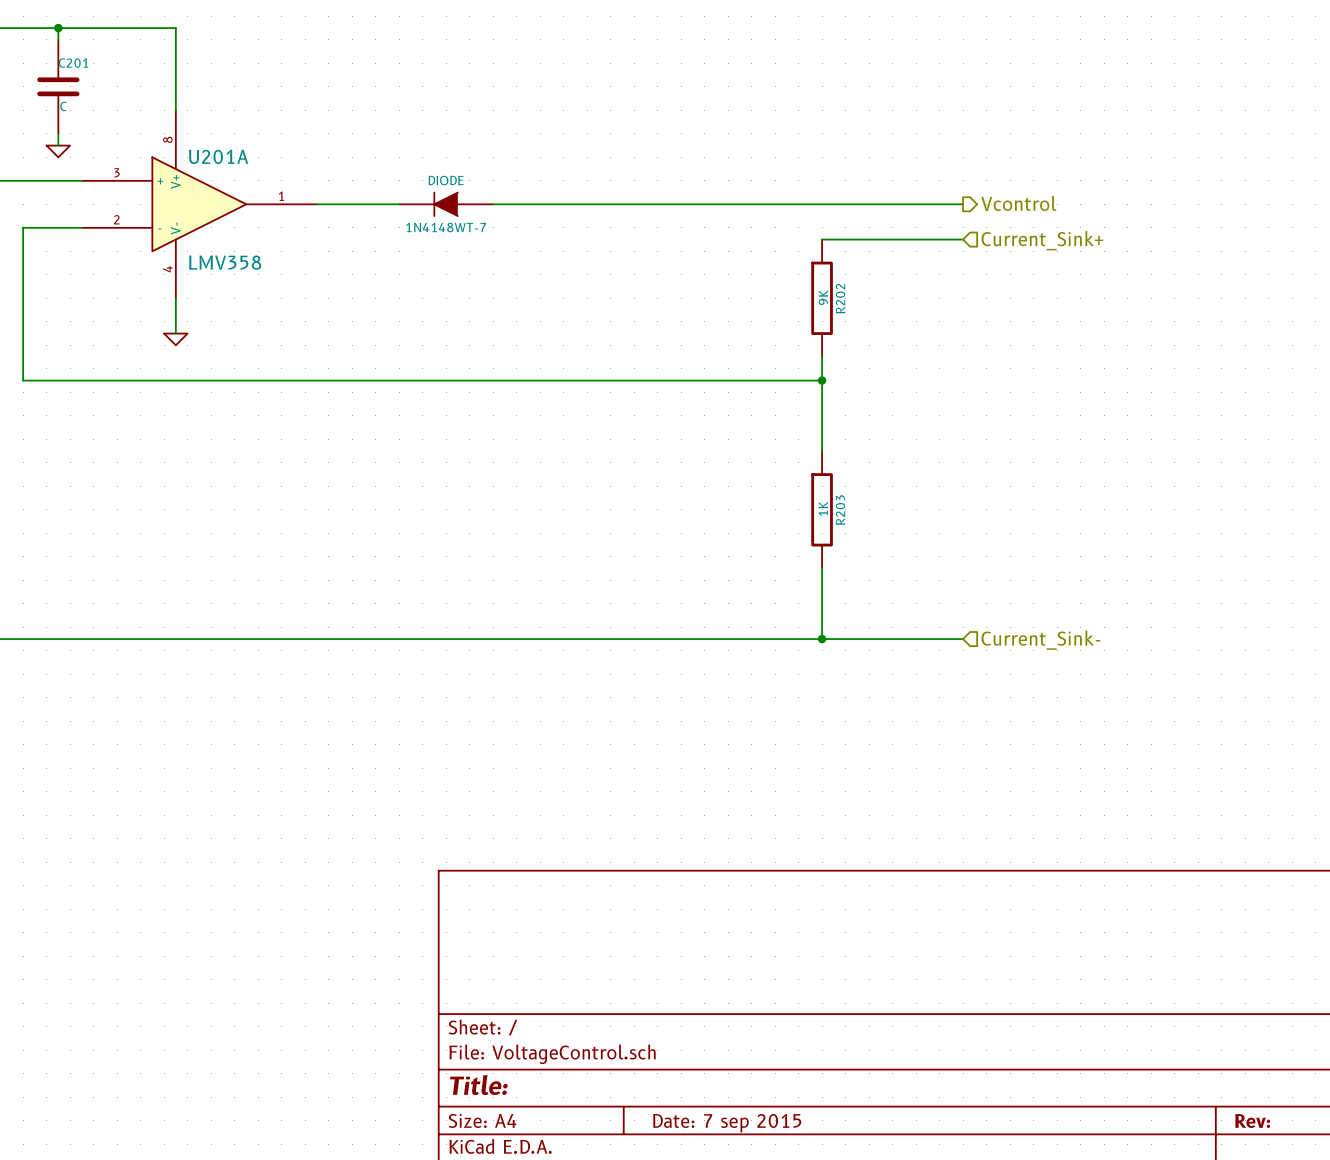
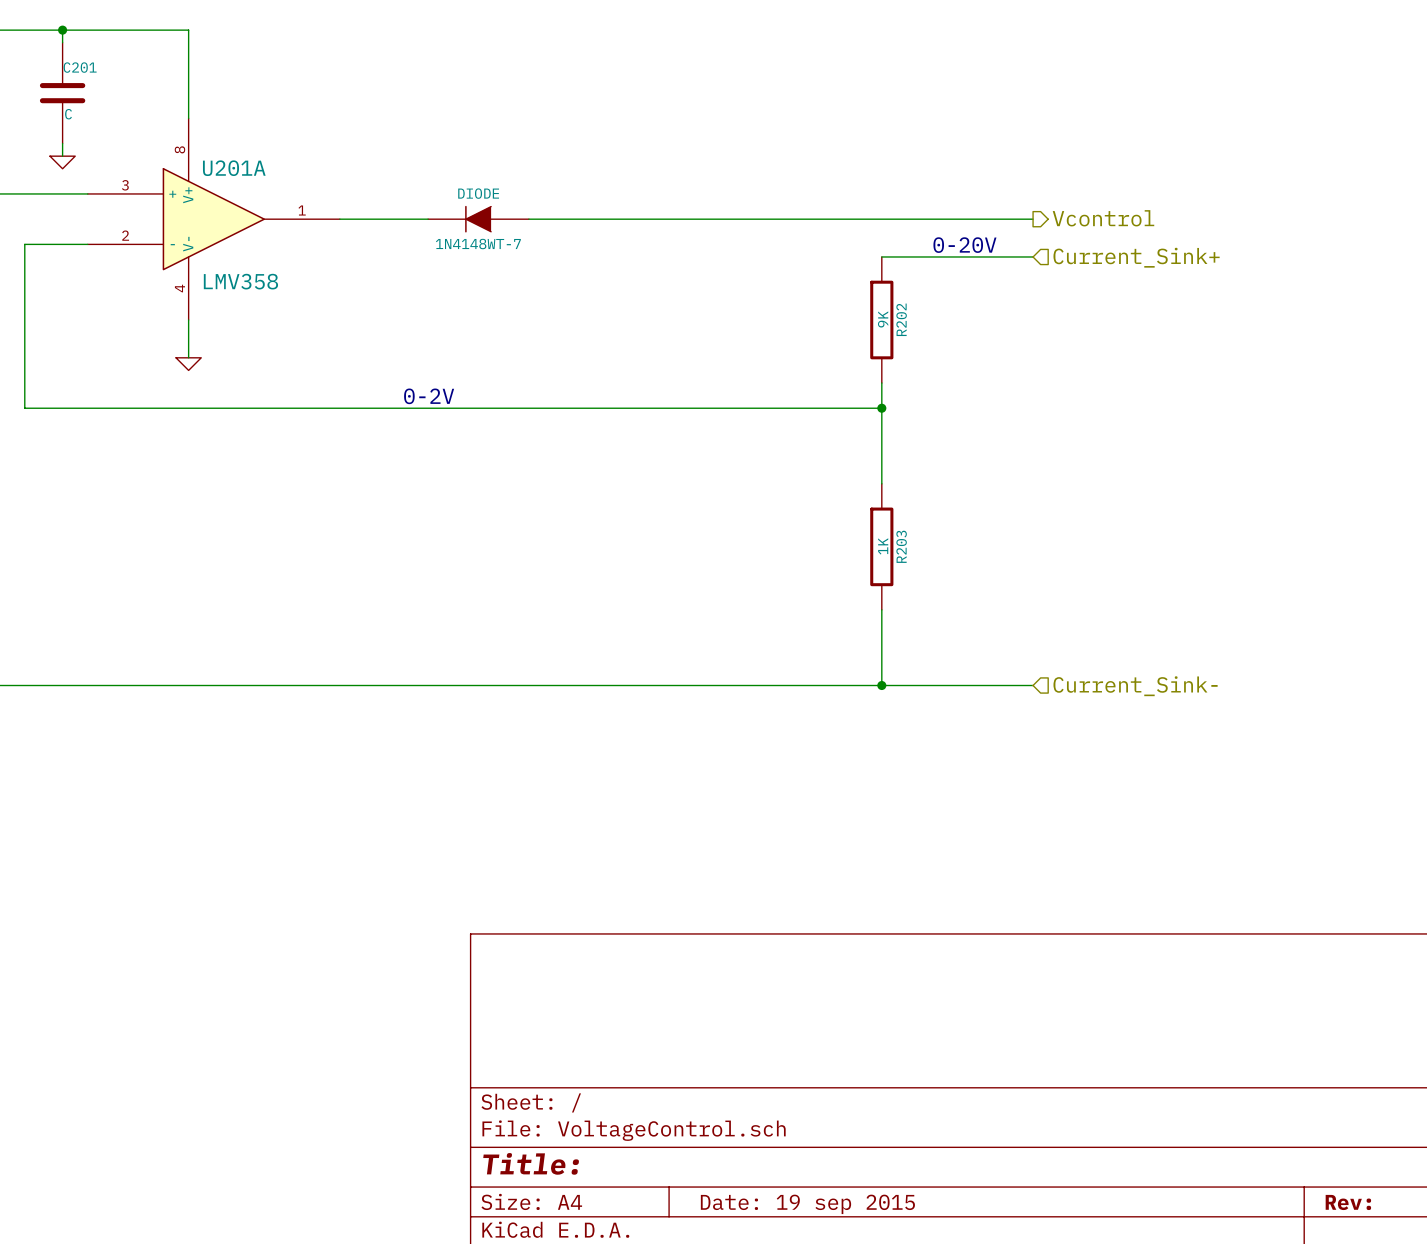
text: none -> 0-20V (964, 245)
text: none -> 0-2V (429, 396)
title block: Date: 7 sep 2015 (727, 1123) -> Date: 19 sep 2015 (807, 1204)

